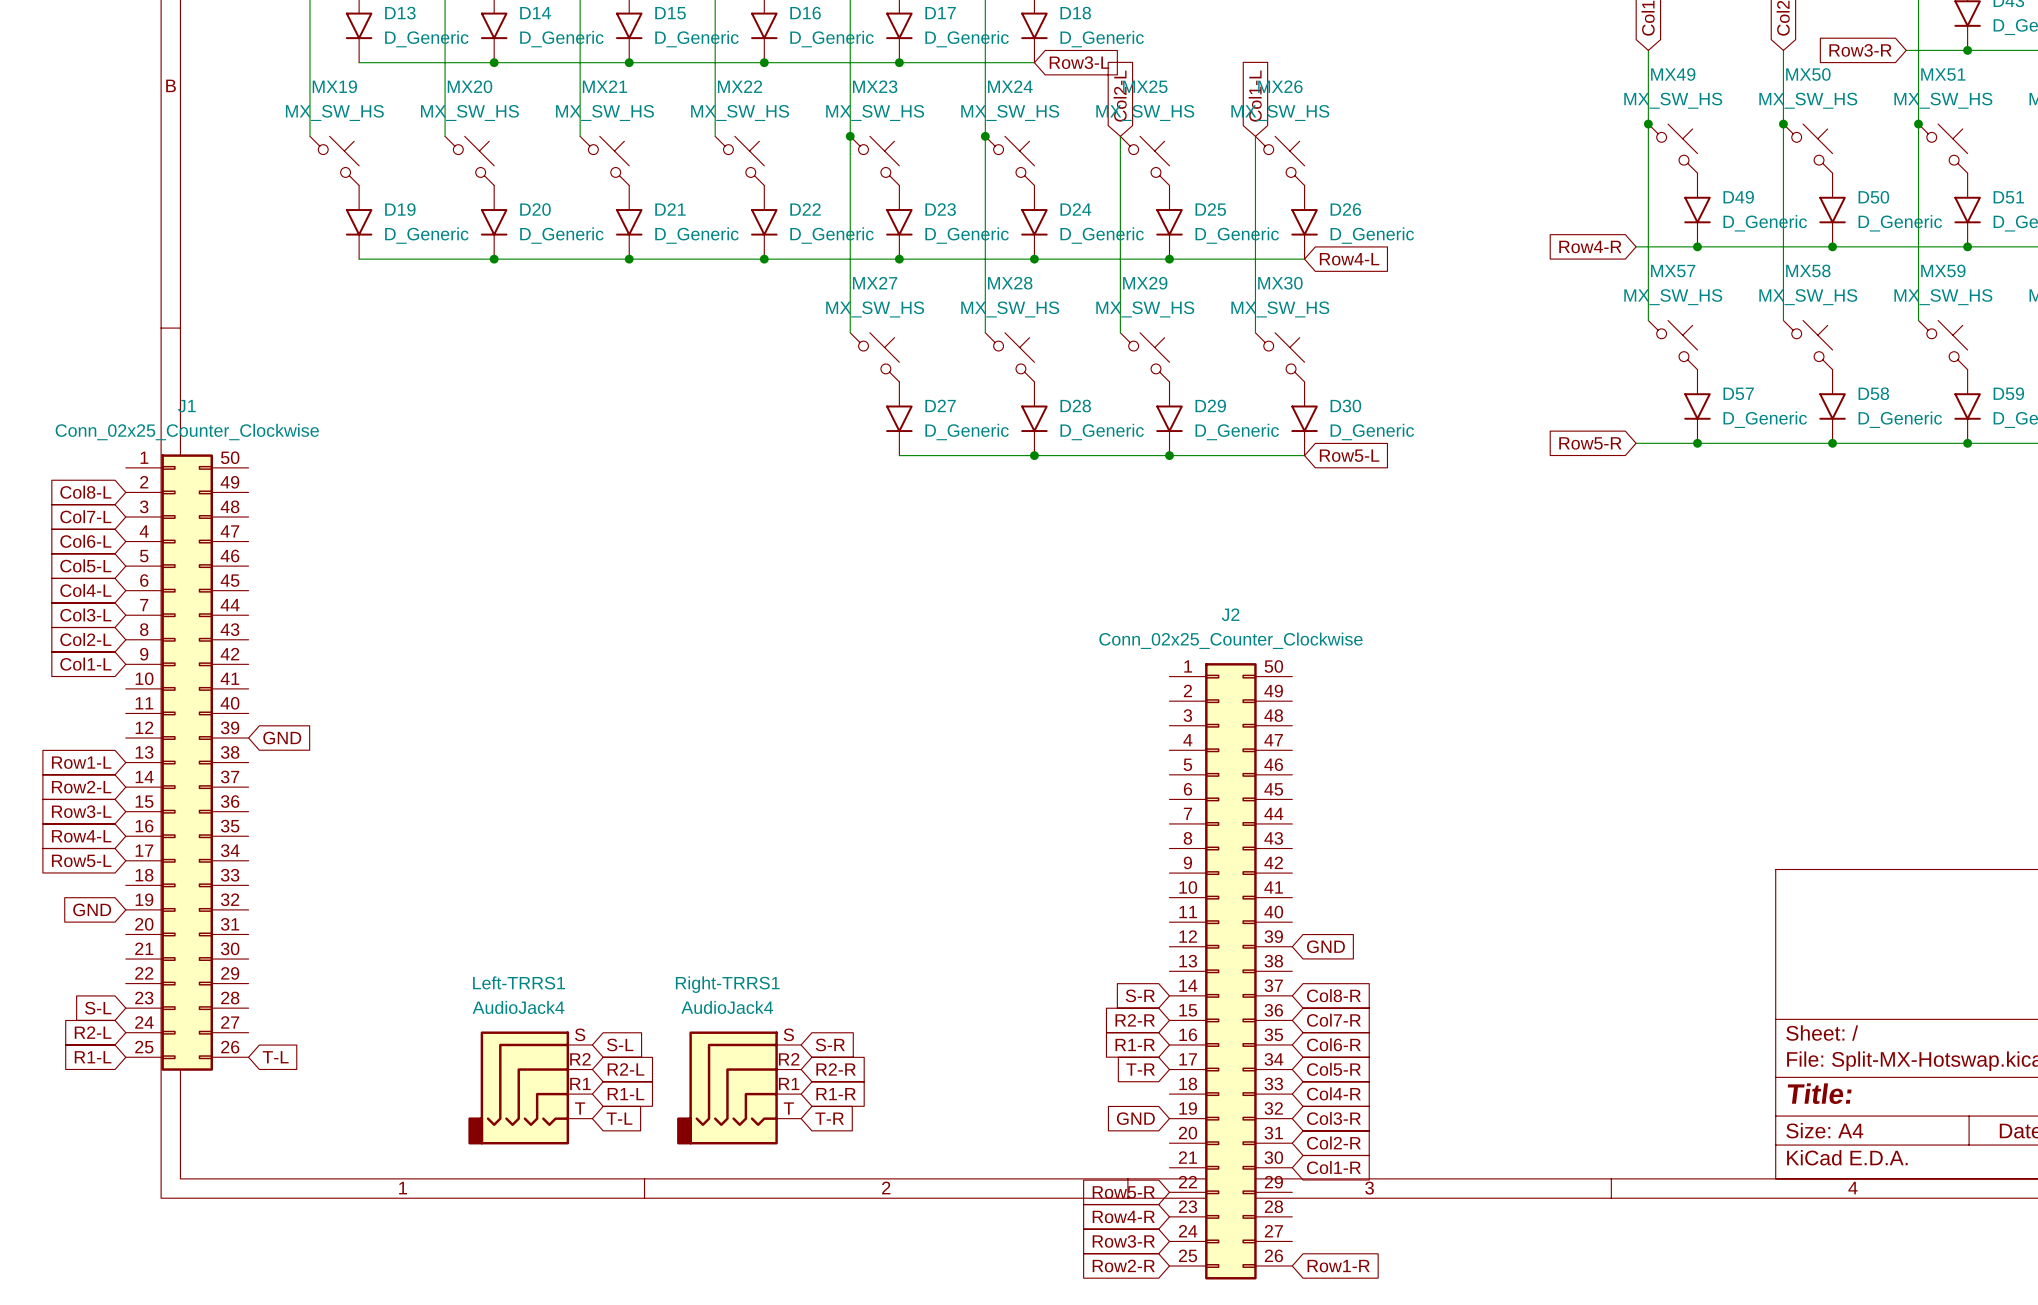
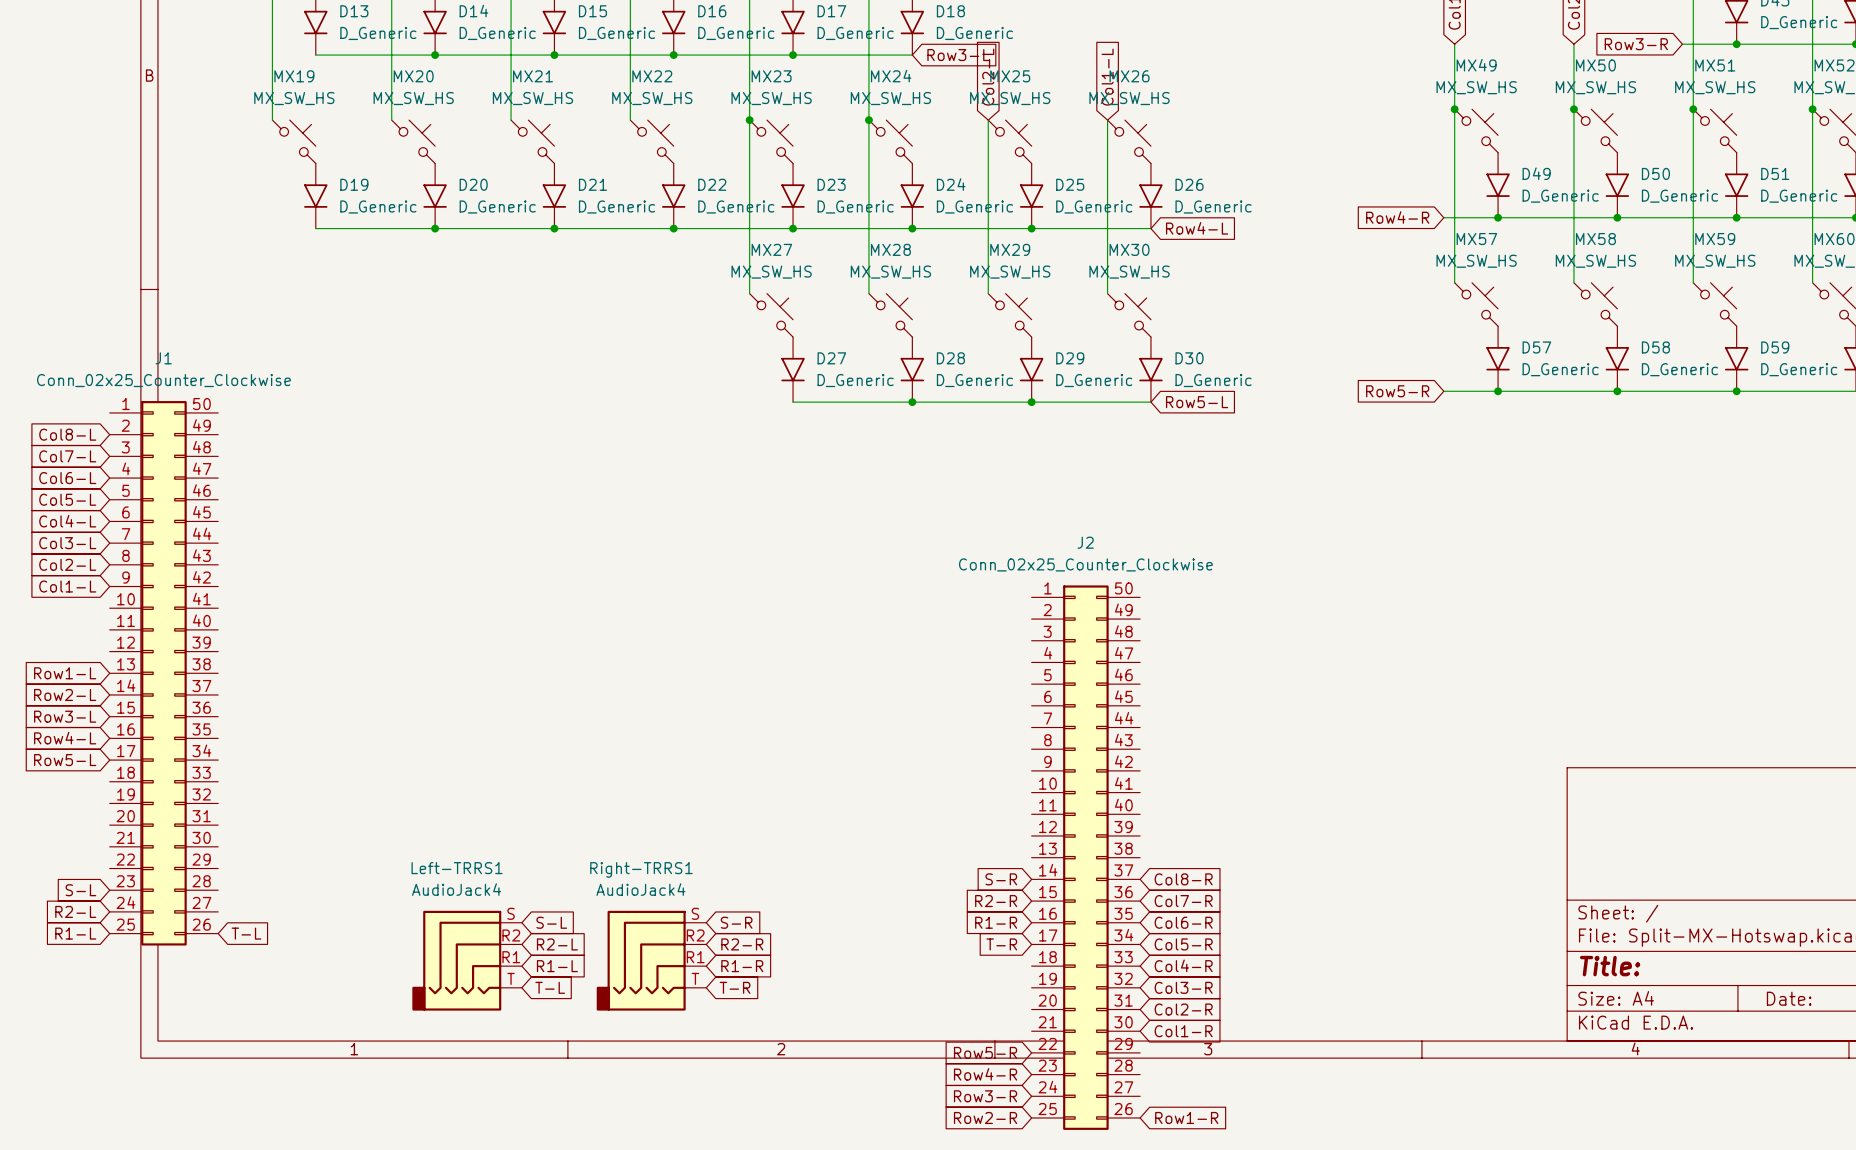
global label: GND (282, 738) -> none
global label: GND (92, 909) -> none
global label: GND (1325, 946) -> none
global label: GND (1135, 1118) -> none

